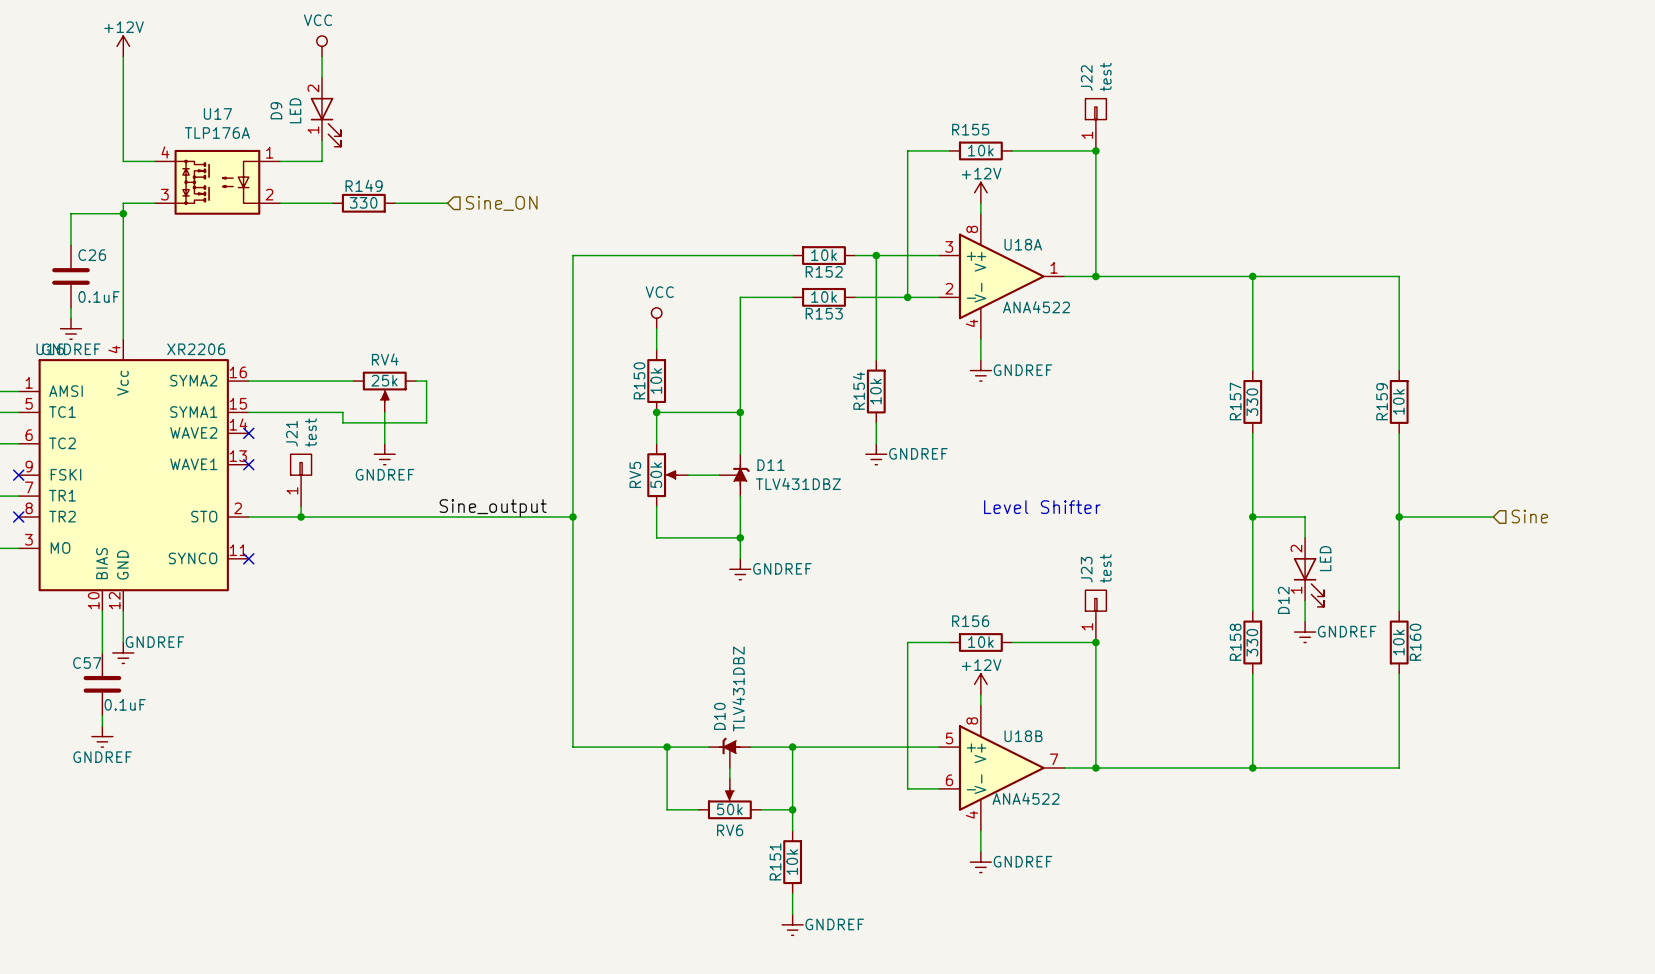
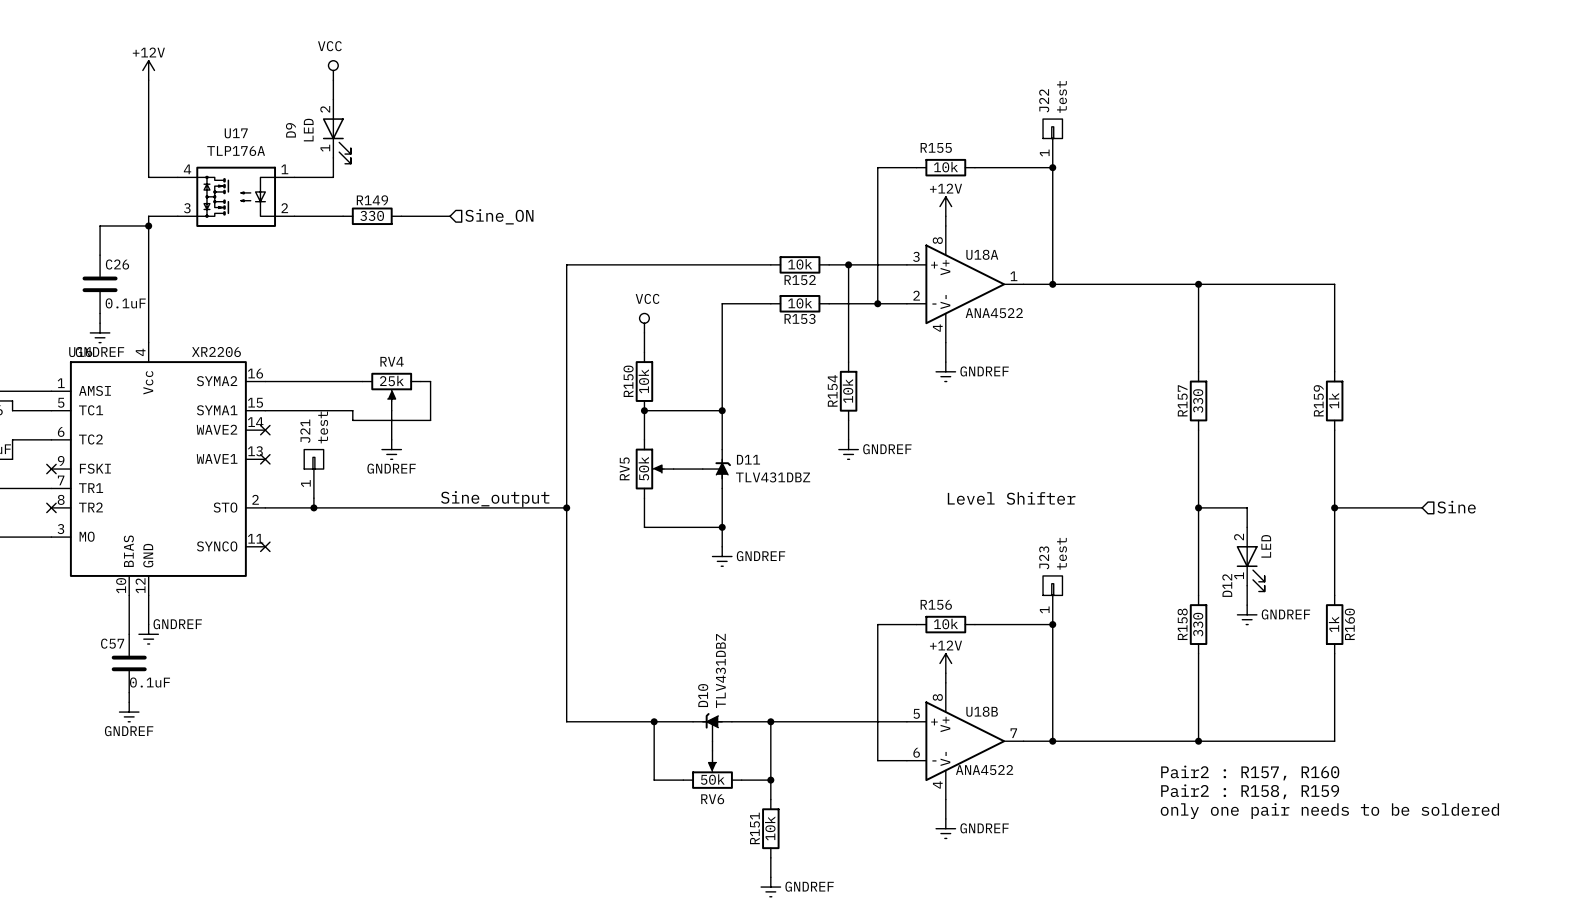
R159 value: 10k (1398, 401) -> 1k (1334, 400)
R160 value: 10k (1398, 642) -> 1k (1334, 624)
text: none -> Pair2 : R157, R160 (1250, 773)
text: none -> Pair2 : R158, R159 (1250, 791)
text: none -> only one pair needs to be soldered (1329, 811)

